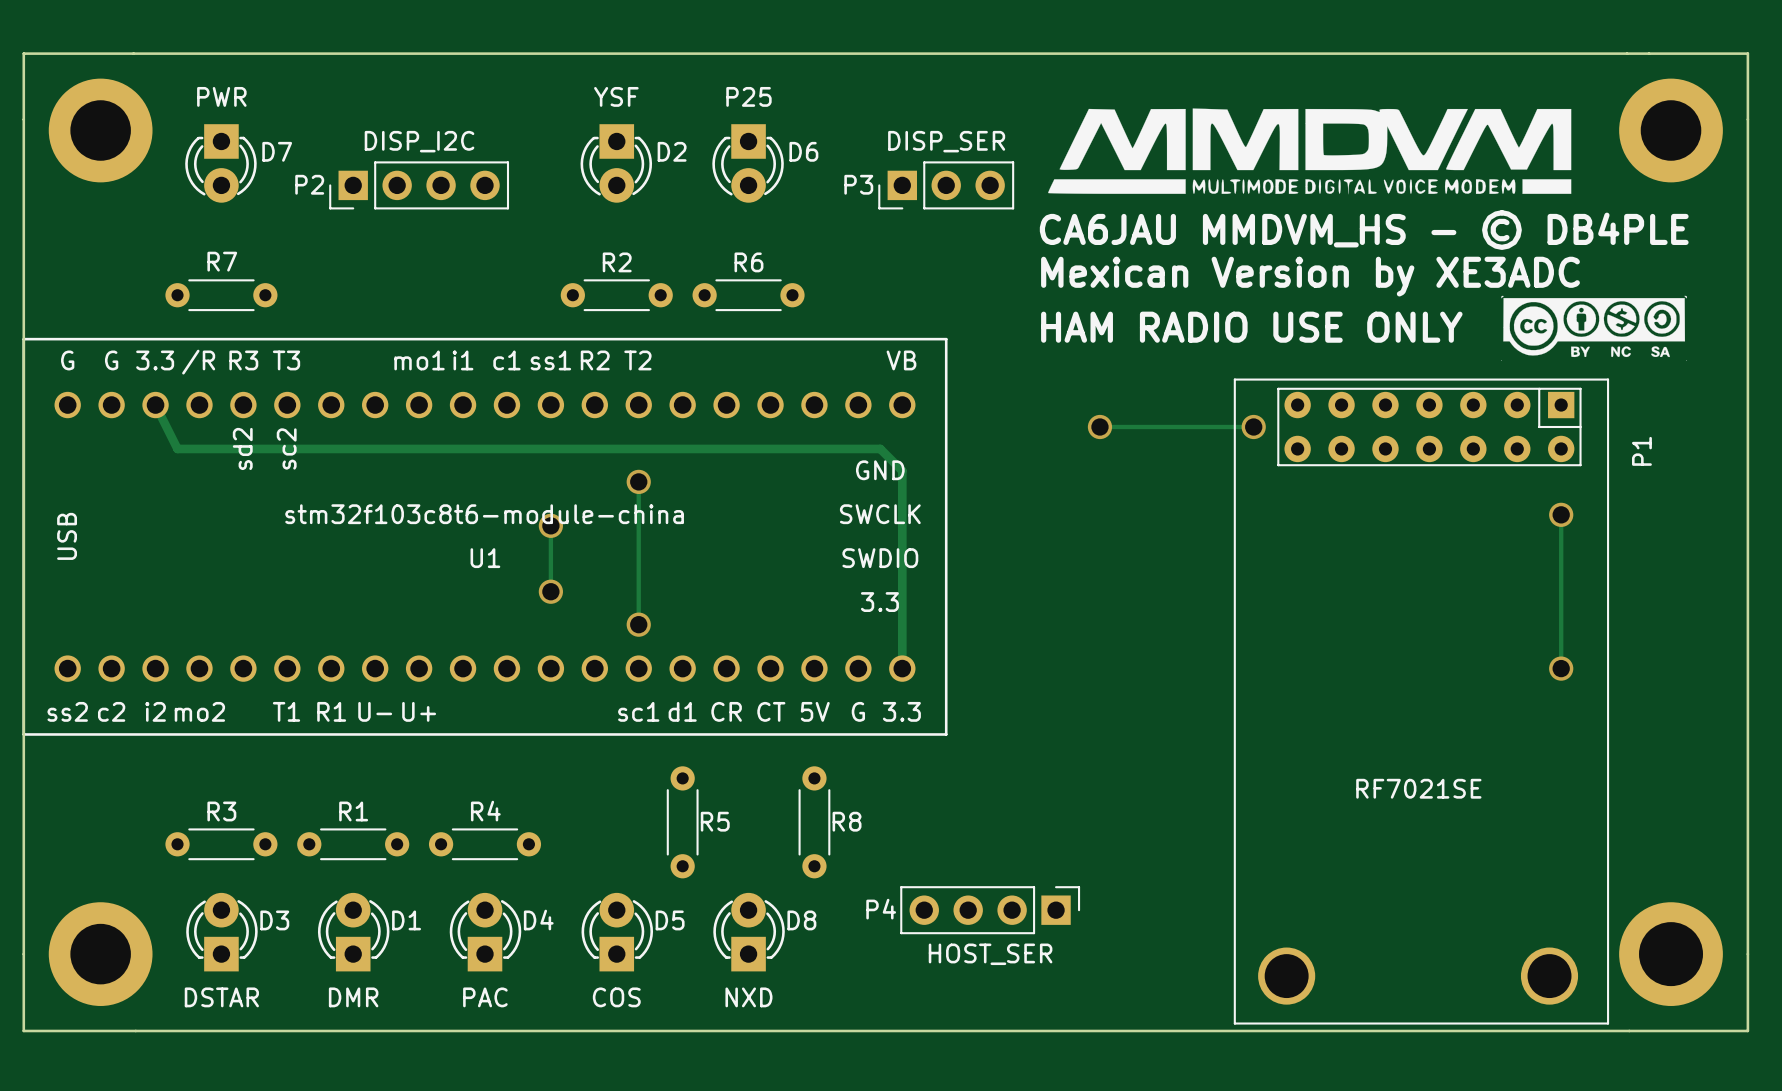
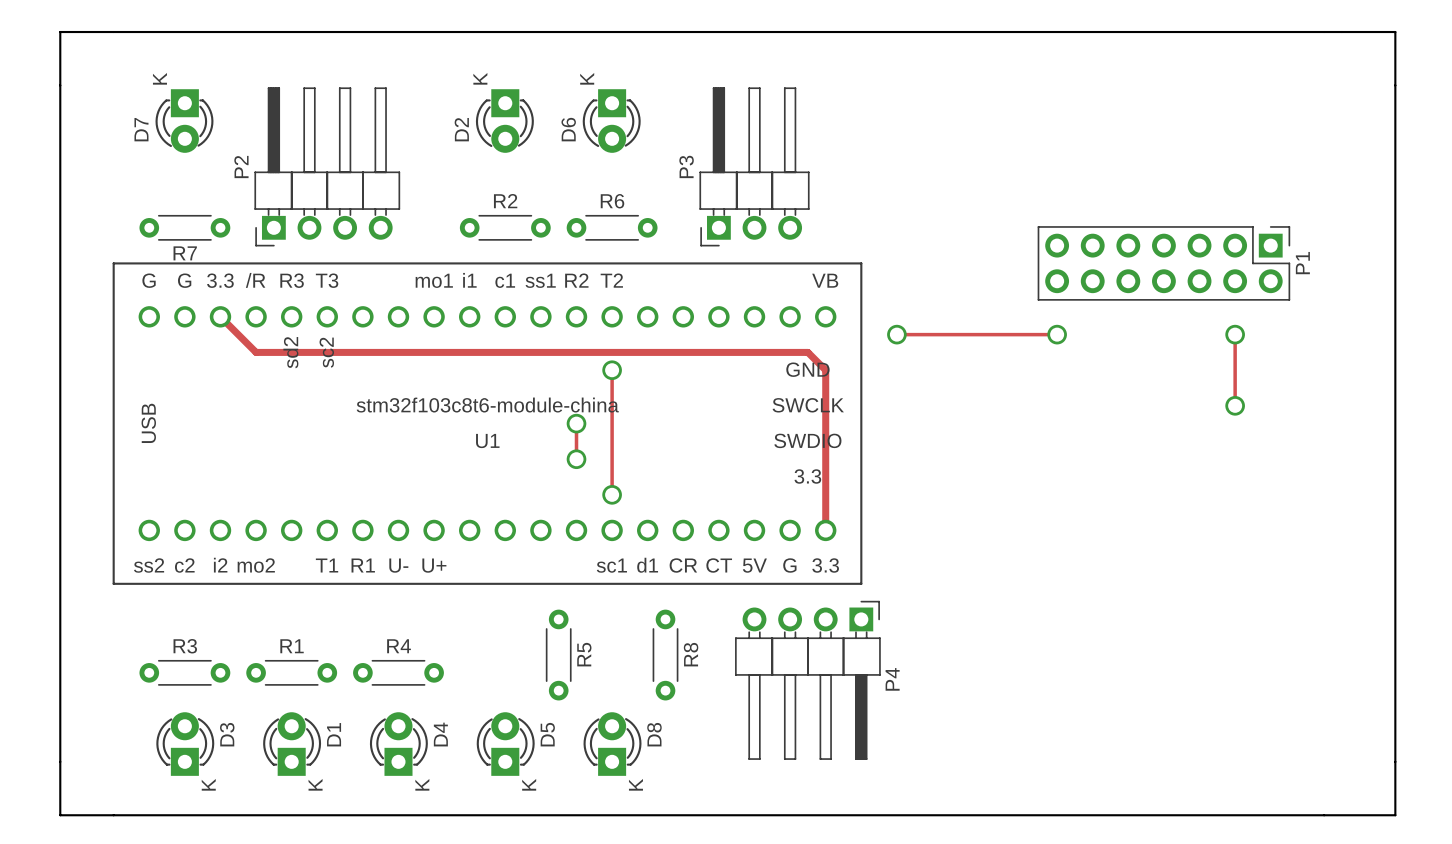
board edge: (67, 53) (23, 53) (23, 1030) (1747, 1030) (1747, 53) (1714, 53) -> (60, 32) (60, 815) (1395, 815) (1395, 32)
D7 value: PWR (221, 96) -> none
D2 value: YSF (616, 96) -> none
D6 value: P25 (748, 96) -> none
drawing: [1048, 108, 1572, 195] -> none
D7 text: none -> K (159, 78)
D2 text: none -> K (480, 78)
D6 text: none -> K (587, 78)
part: (100, 130) -> none
part: (1671, 130) -> none
P2 value: DISP_I2C (419, 141) -> none
P3 value: DISP_SER (946, 141) -> none
D7 name rotation: 0° (277, 151) -> 90° counterclockwise (141, 129)
D7 name position: D7 (277, 151) -> D7 (141, 129)
D2 name rotation: 0° (672, 151) -> 90° counterclockwise (461, 129)
D2 name position: D2 (672, 151) -> D2 (461, 129)
D6 name rotation: 0° (803, 151) -> 90° counterclockwise (568, 129)
D6 name position: D6 (803, 151) -> D6 (568, 129)
P2 footprint: [329, 161, 510, 210] -> [254, 87, 401, 247]
P3 footprint: [878, 161, 1015, 210] -> [699, 87, 810, 247]
text: CA6JAU MMDVM_HS - © DB4PLE (1364, 230) -> none
R7 name position: R7 (222, 261) -> R7 (185, 253)
text: Mexican Version by XE3ADC (1310, 276) -> none
drawing: [1501, 295, 1687, 361] -> none
text: HAM RADIO USE ONLY (1251, 327) -> none
P1 footprint: [1233, 378, 1610, 1025] -> [1037, 226, 1291, 301]
track: (155, 405) (177, 448) (309, 448) -> (220, 316) (256, 352)
track: none -> (1021, 334) (1057, 334)
via position: (1253, 427) -> (1057, 334)
track: none -> (1235, 334) (1235, 405)
via: none -> (1235, 334)
track: (880, 448) (902, 470) (902, 668) -> (718, 352) (807, 352) (825, 370) (825, 530)
P1 name position: P1 (1641, 451) -> P1 (1302, 263)
track: none -> (612, 370) (612, 494)
via: none -> (612, 370)
track: (638, 481) (638, 624) -> none
via: (638, 481) -> none
track: (1561, 514) (1561, 668) -> none
via position: (1561, 514) -> (1235, 405)
track: (550, 525) (550, 591) -> none
via: (550, 525) -> none
U1 position: (485, 536) -> (487, 423)
track: none -> (576, 423) (576, 459)
via: none -> (576, 423)
via: none -> (576, 459)
via: (550, 591) -> none
via: (638, 624) -> none
via: none -> (612, 494)
via: (1561, 668) -> none
P1 value: RF7021SE (1418, 788) -> none
R5 name rotation: 0° (715, 821) -> 90° counterclockwise (584, 654)
R8 name rotation: 0° (847, 821) -> 90° counterclockwise (691, 654)
P4 footprint: [900, 886, 1081, 935] -> [735, 600, 881, 760]
P4 name position: P4 (881, 909) -> P4 (892, 679)
D3 name rotation: 0° (274, 920) -> 90° counterclockwise (227, 734)
D1 name rotation: 0° (406, 920) -> 90° counterclockwise (334, 734)
D4 name rotation: 0° (538, 920) -> 90° counterclockwise (440, 734)
D5 name rotation: 0° (670, 920) -> 90° counterclockwise (547, 734)
D8 name rotation: 0° (801, 920) -> 90° counterclockwise (654, 734)
part: (100, 954) -> none
P4 value: HOST_SER (990, 954) -> none
part: (1671, 954) -> none
D3 text: none -> K (208, 784)
D1 text: none -> K (315, 784)
D4 text: none -> K (422, 784)
D5 text: none -> K (529, 784)
D8 text: none -> K (635, 784)
D3 value: DSTAR (221, 997) -> none
D1 value: DMR (353, 997) -> none
D4 value: PAC (485, 997) -> none
D5 value: COS (616, 997) -> none
D8 value: NXD (748, 997) -> none

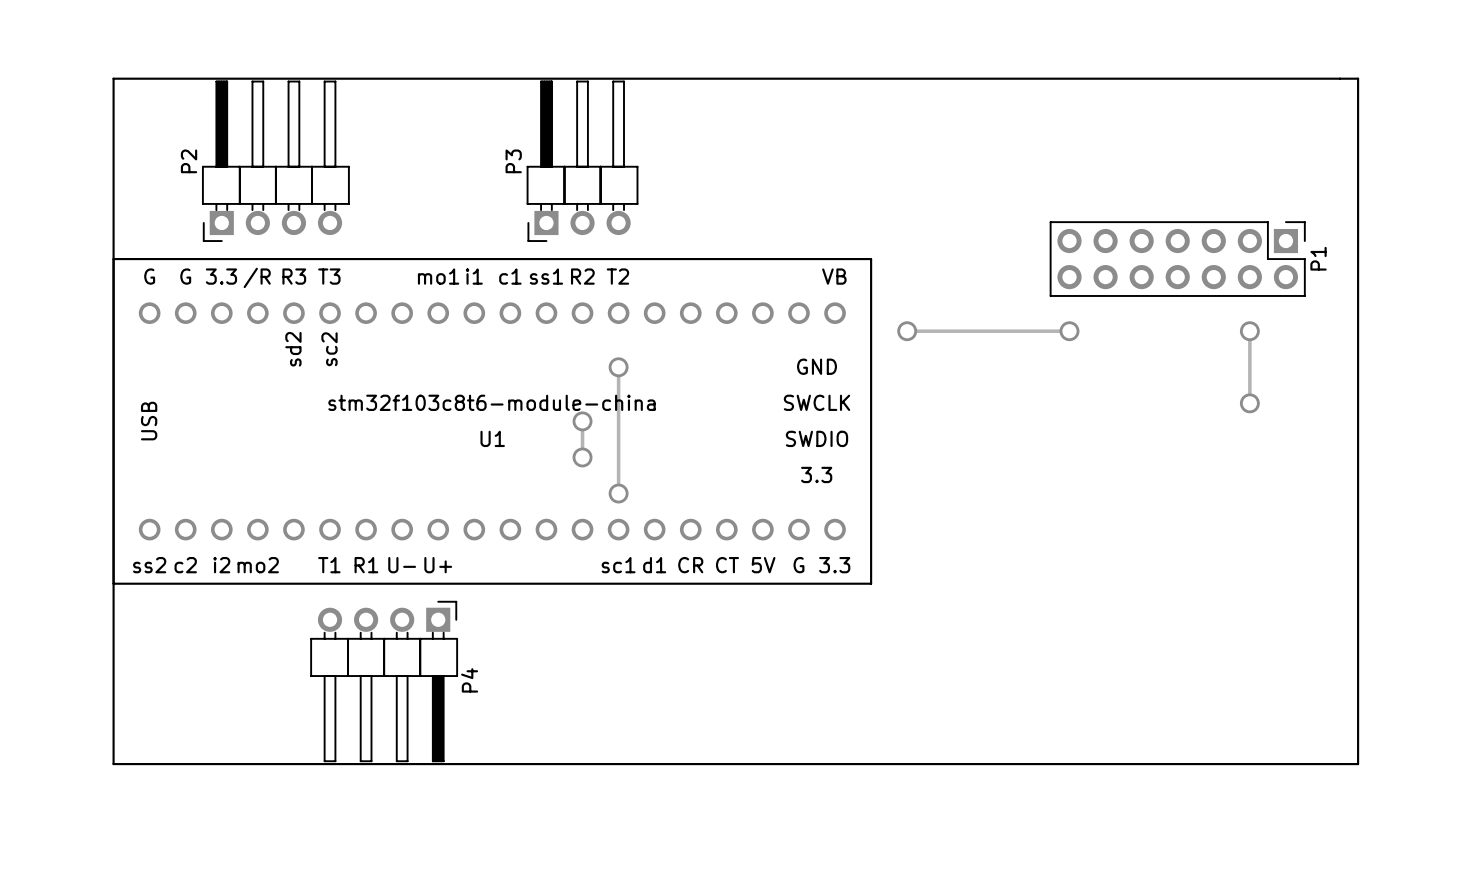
board edge: (60, 32) (60, 815) (1395, 815) (1395, 32) (60, 32) -> (113, 78) (113, 764) (1358, 764) (1358, 78) (113, 78)
D7: (184, 121) -> none
D2: (504, 121) -> none
D6: (611, 121) -> none
P2 position: (327, 166) -> (275, 161)
P3 position: (754, 166) -> (582, 161)
R7: (184, 227) -> none
R2: (505, 227) -> none
R6: (612, 227) -> none
track: (220, 316) (256, 352) (807, 352) (825, 370) (825, 530) -> none
R5: (558, 655) -> none
R8: (665, 655) -> none
R3: (184, 672) -> none
R1: (291, 672) -> none
R4: (398, 672) -> none
P4 position: (807, 680) -> (384, 681)
D3: (185, 744) -> none
D1: (292, 744) -> none
D4: (398, 744) -> none
D5: (505, 744) -> none
D8: (612, 744) -> none

